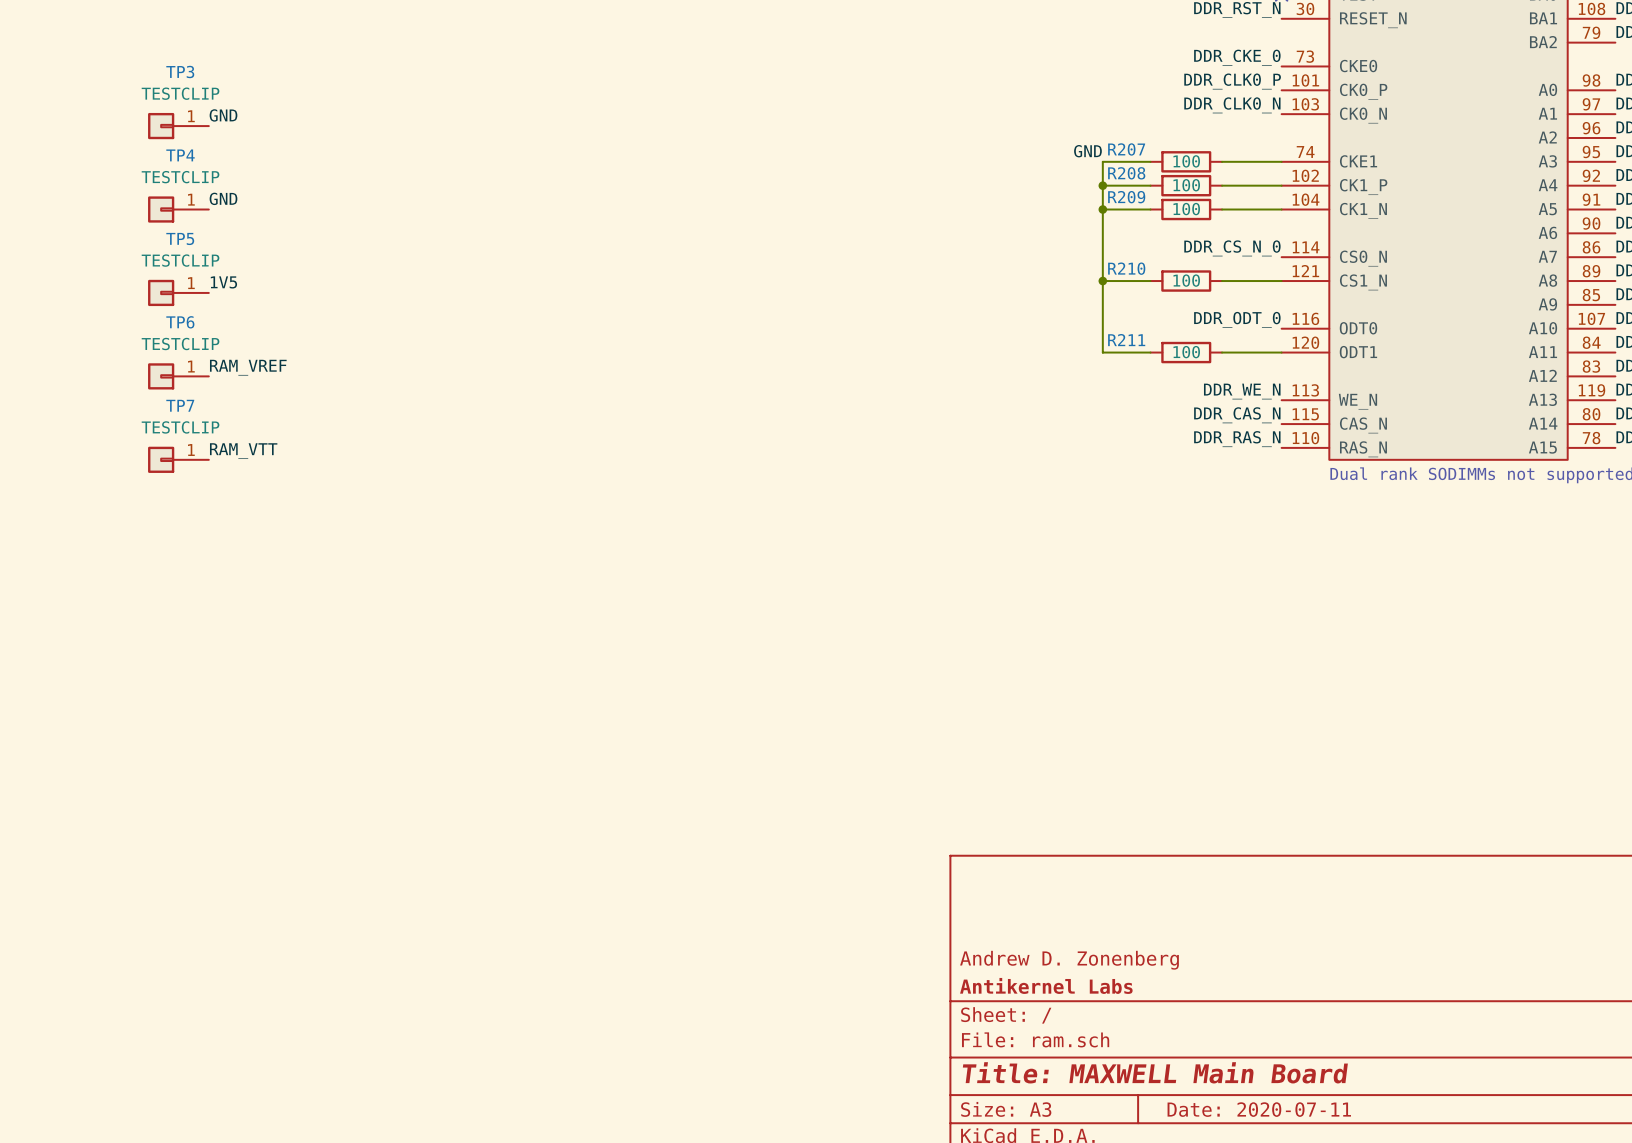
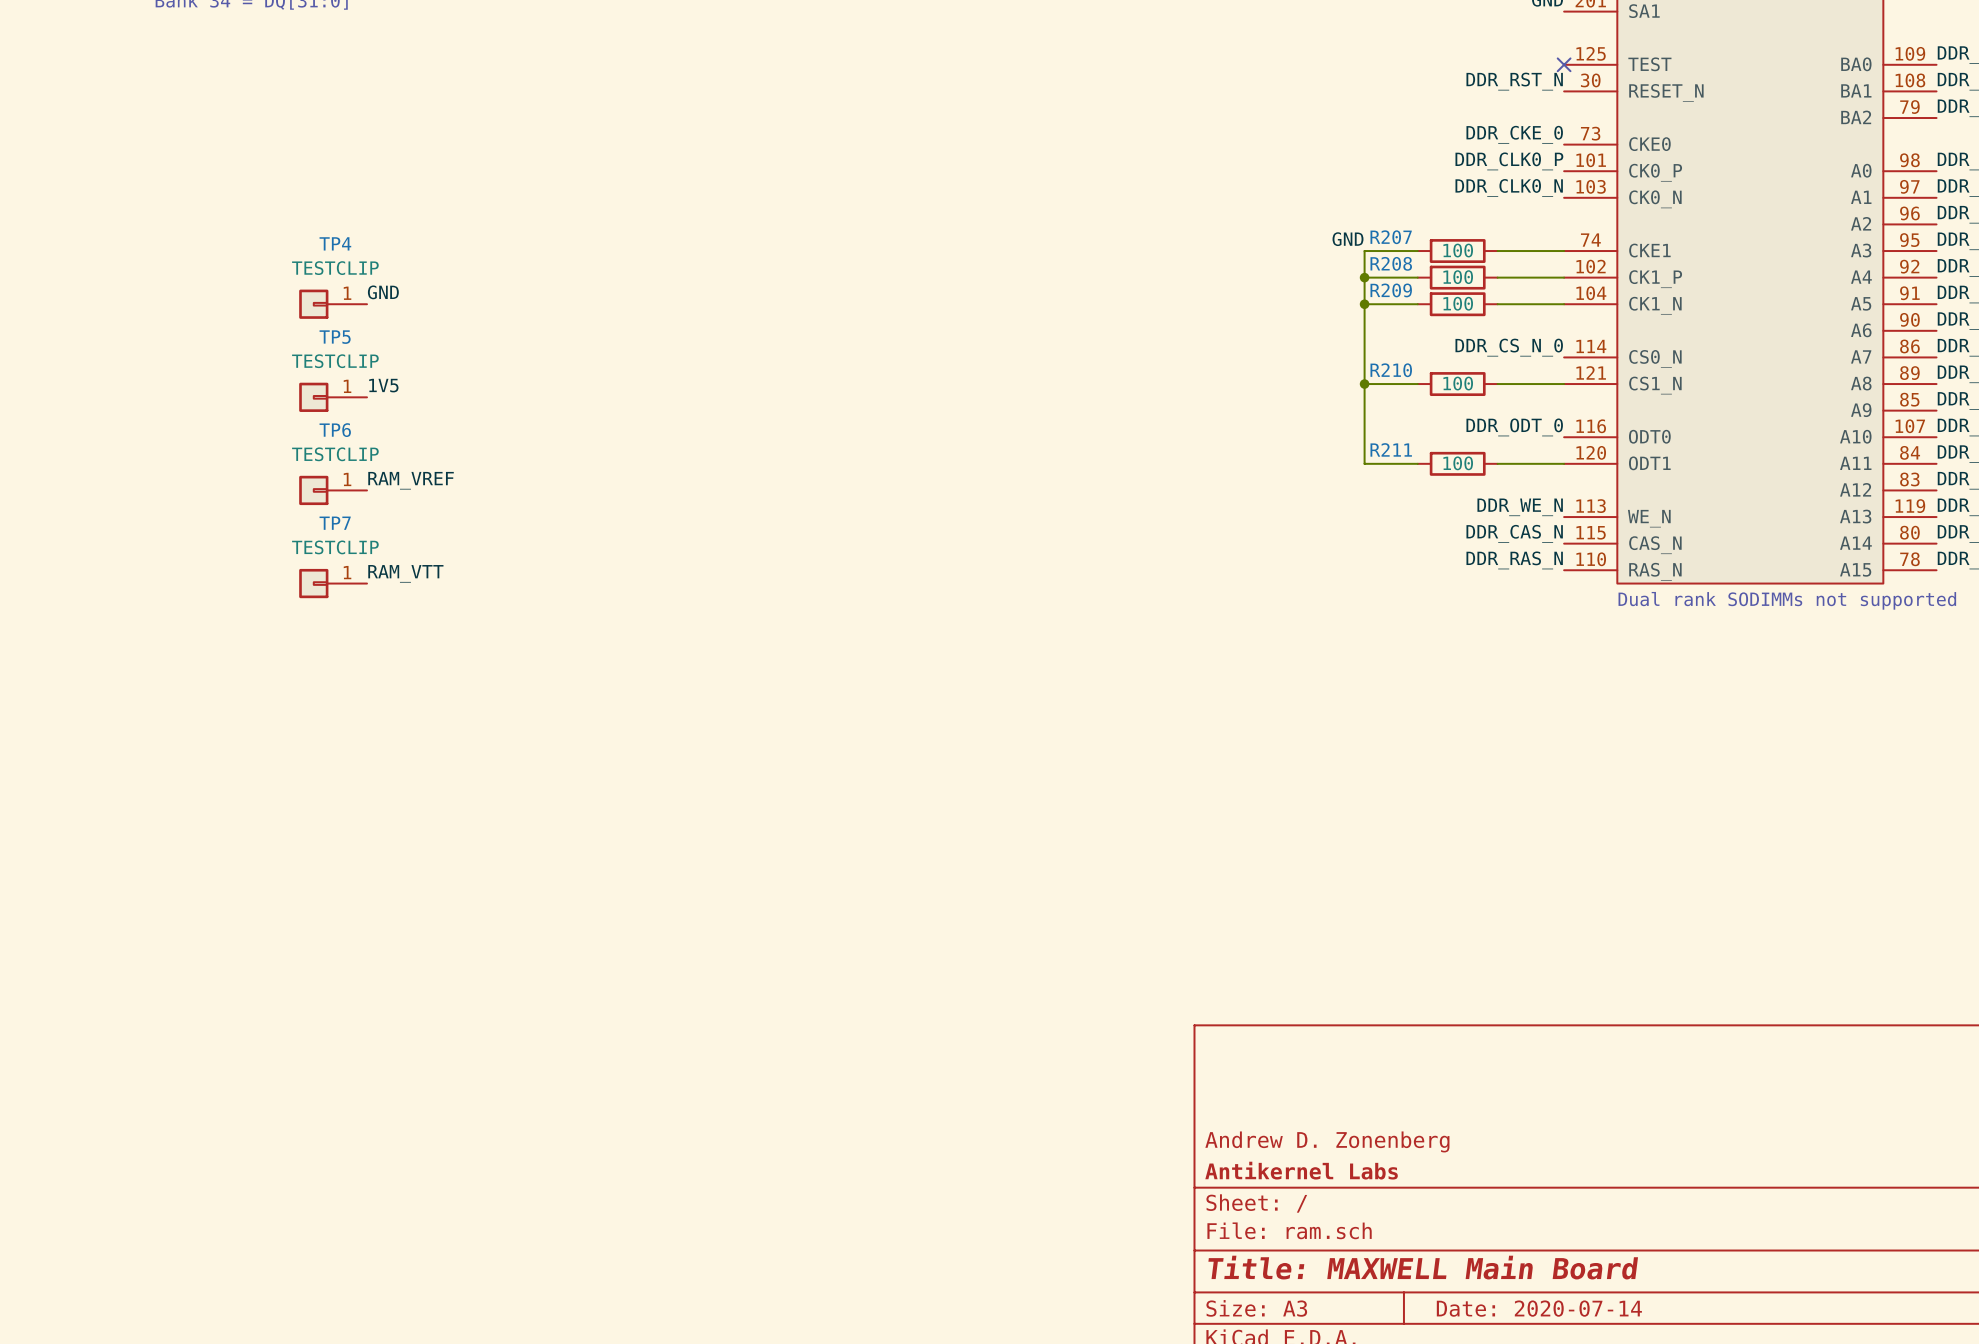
label: GND (223, 115) -> none
TP3: TESTCLIP (178, 126) -> none
title block: Date: 2020-07-11 (1259, 1109) -> Date: 2020-07-14 (1539, 1308)

